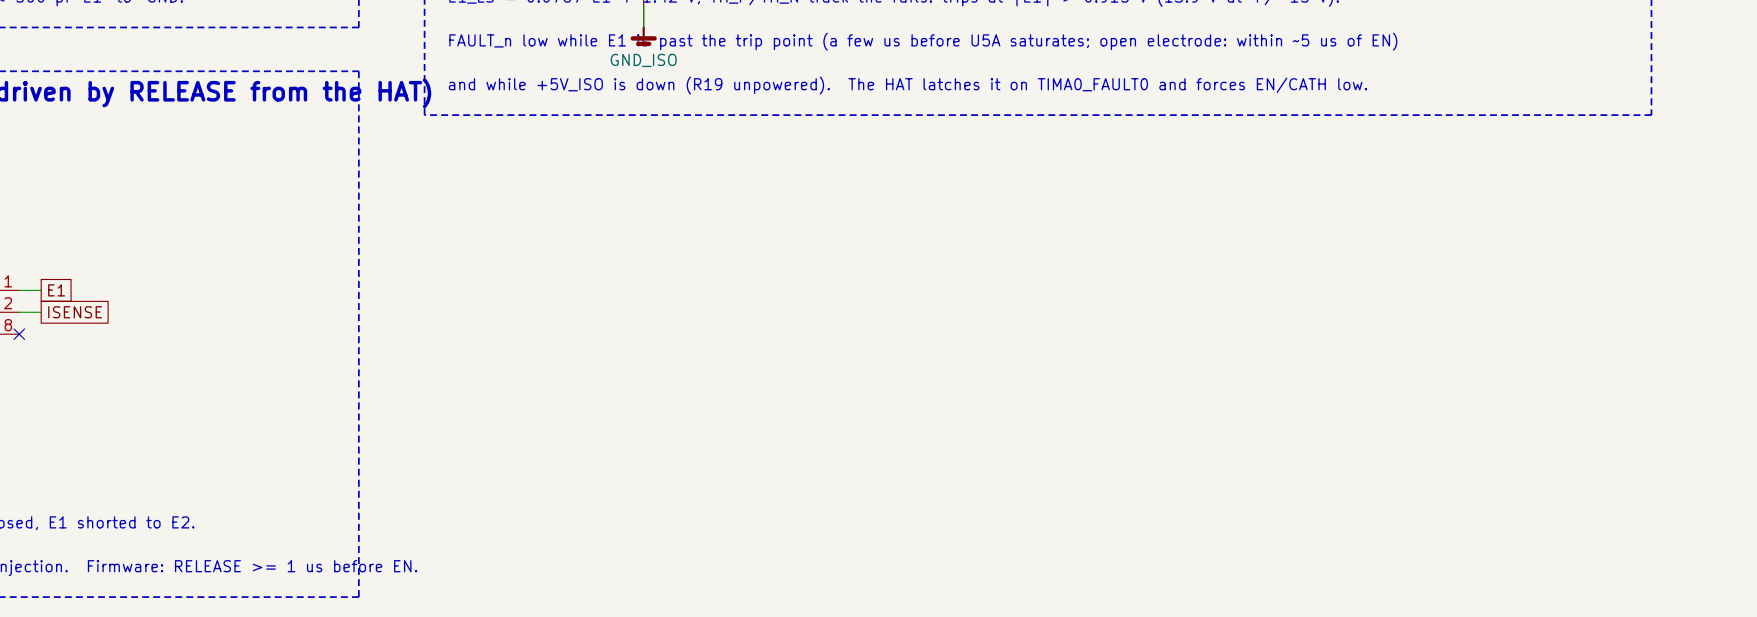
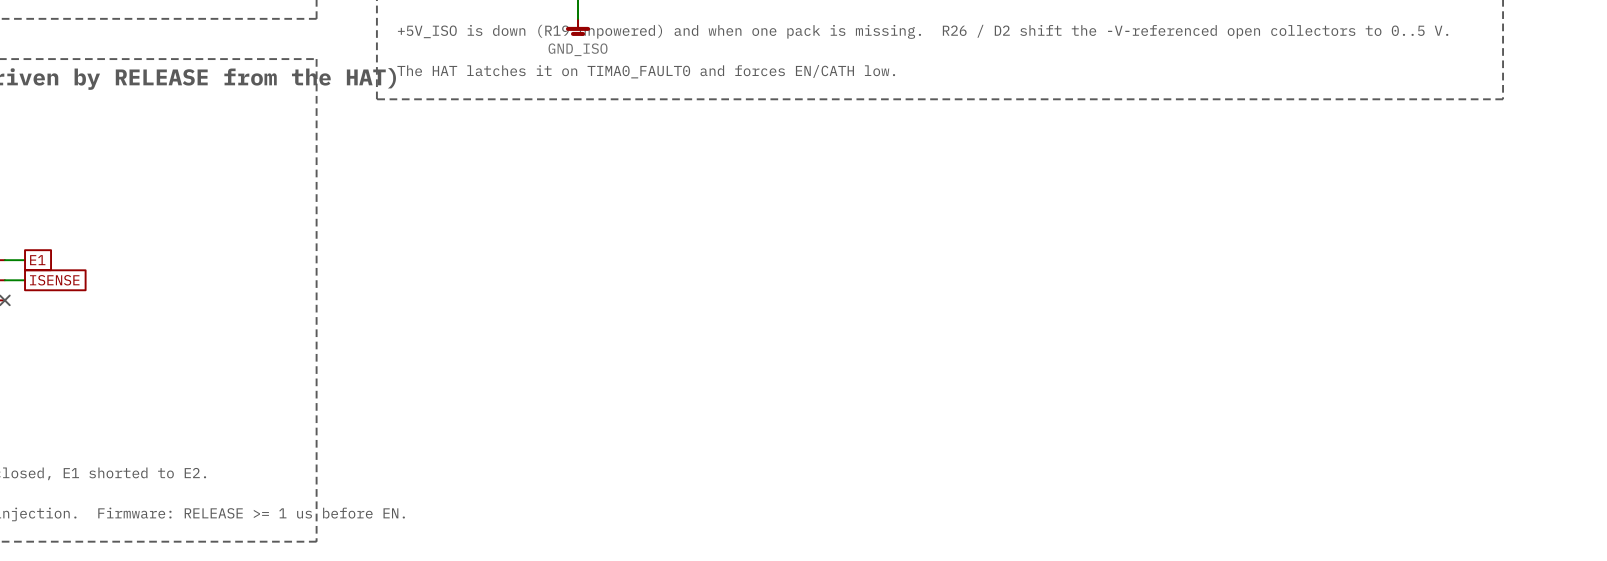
text: FAULT_n low while E1 is past the trip point (a few us before U5A saturates; open electrode: within ~5 us of EN) (923, 41) -> +5V_ISO is down (R19 unpowered) and when one pack is missing. R26 / D2 shift the -V-referenced open collectors to 0..5 V. (923, 31)
text: and while +5V_ISO is down (R19 unpowered). The HAT latches it on TIMA0_FAULT0 and forces EN/CATH low. (907, 85) -> The HAT latches it on TIMA0_FAULT0 and forces EN/CATH low. (646, 71)

